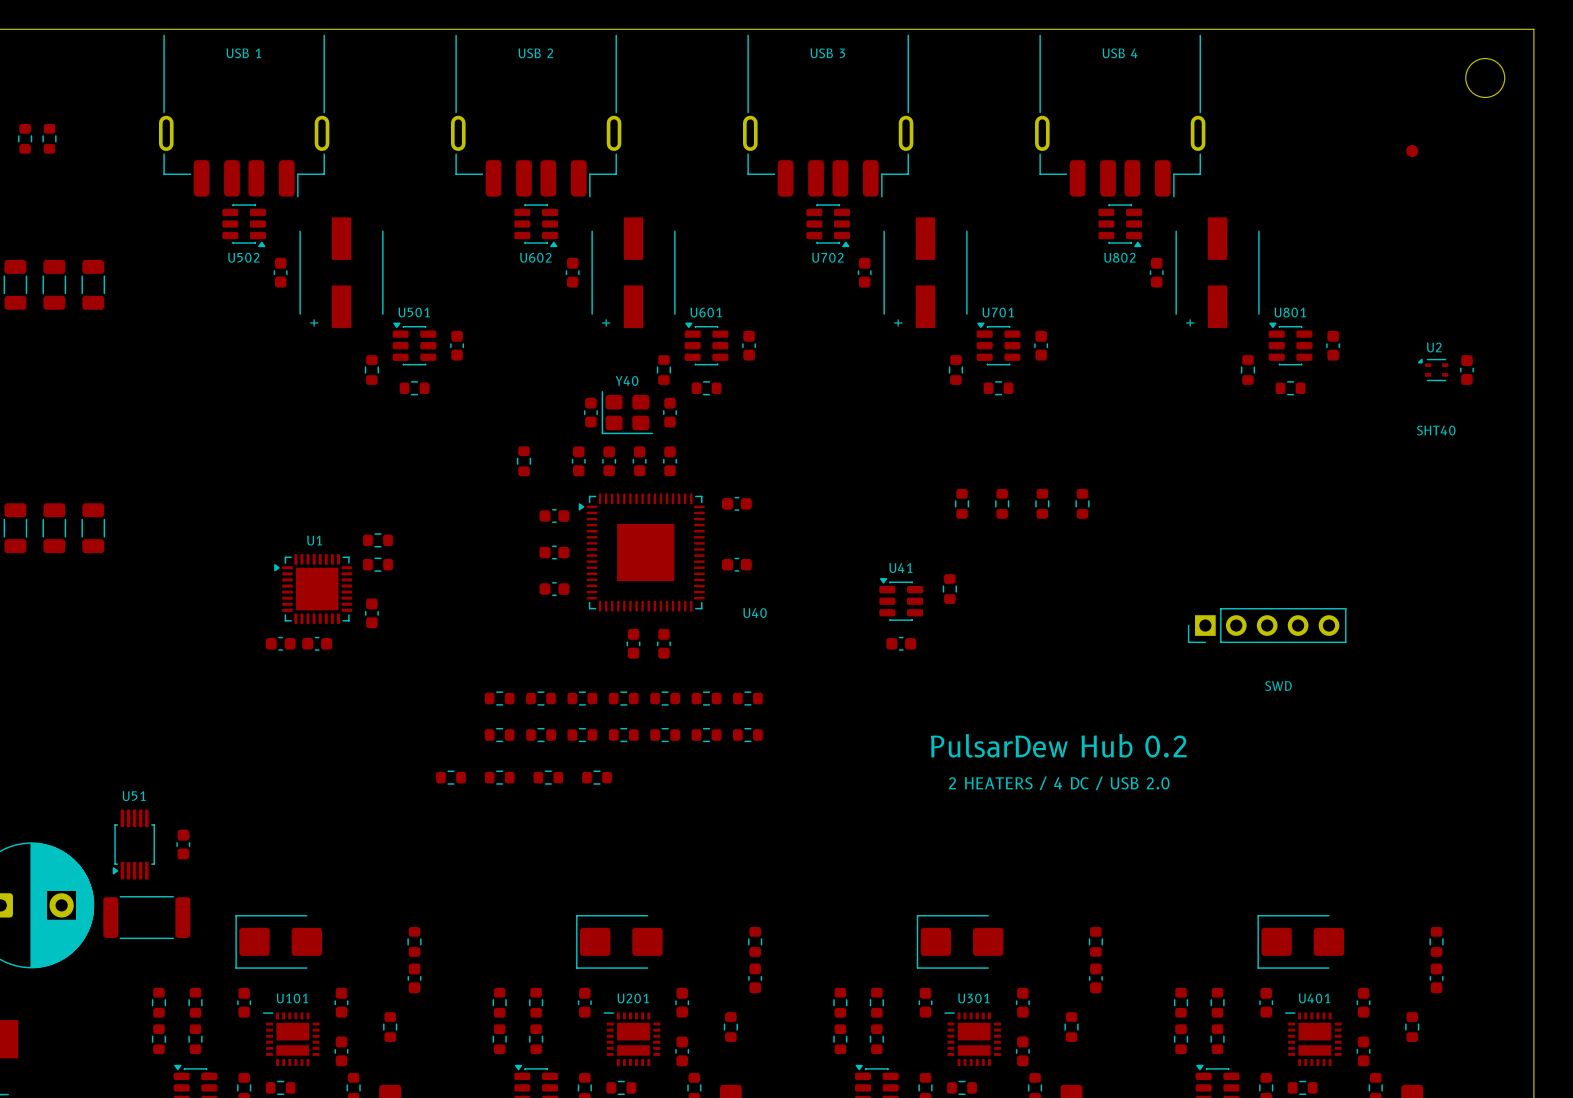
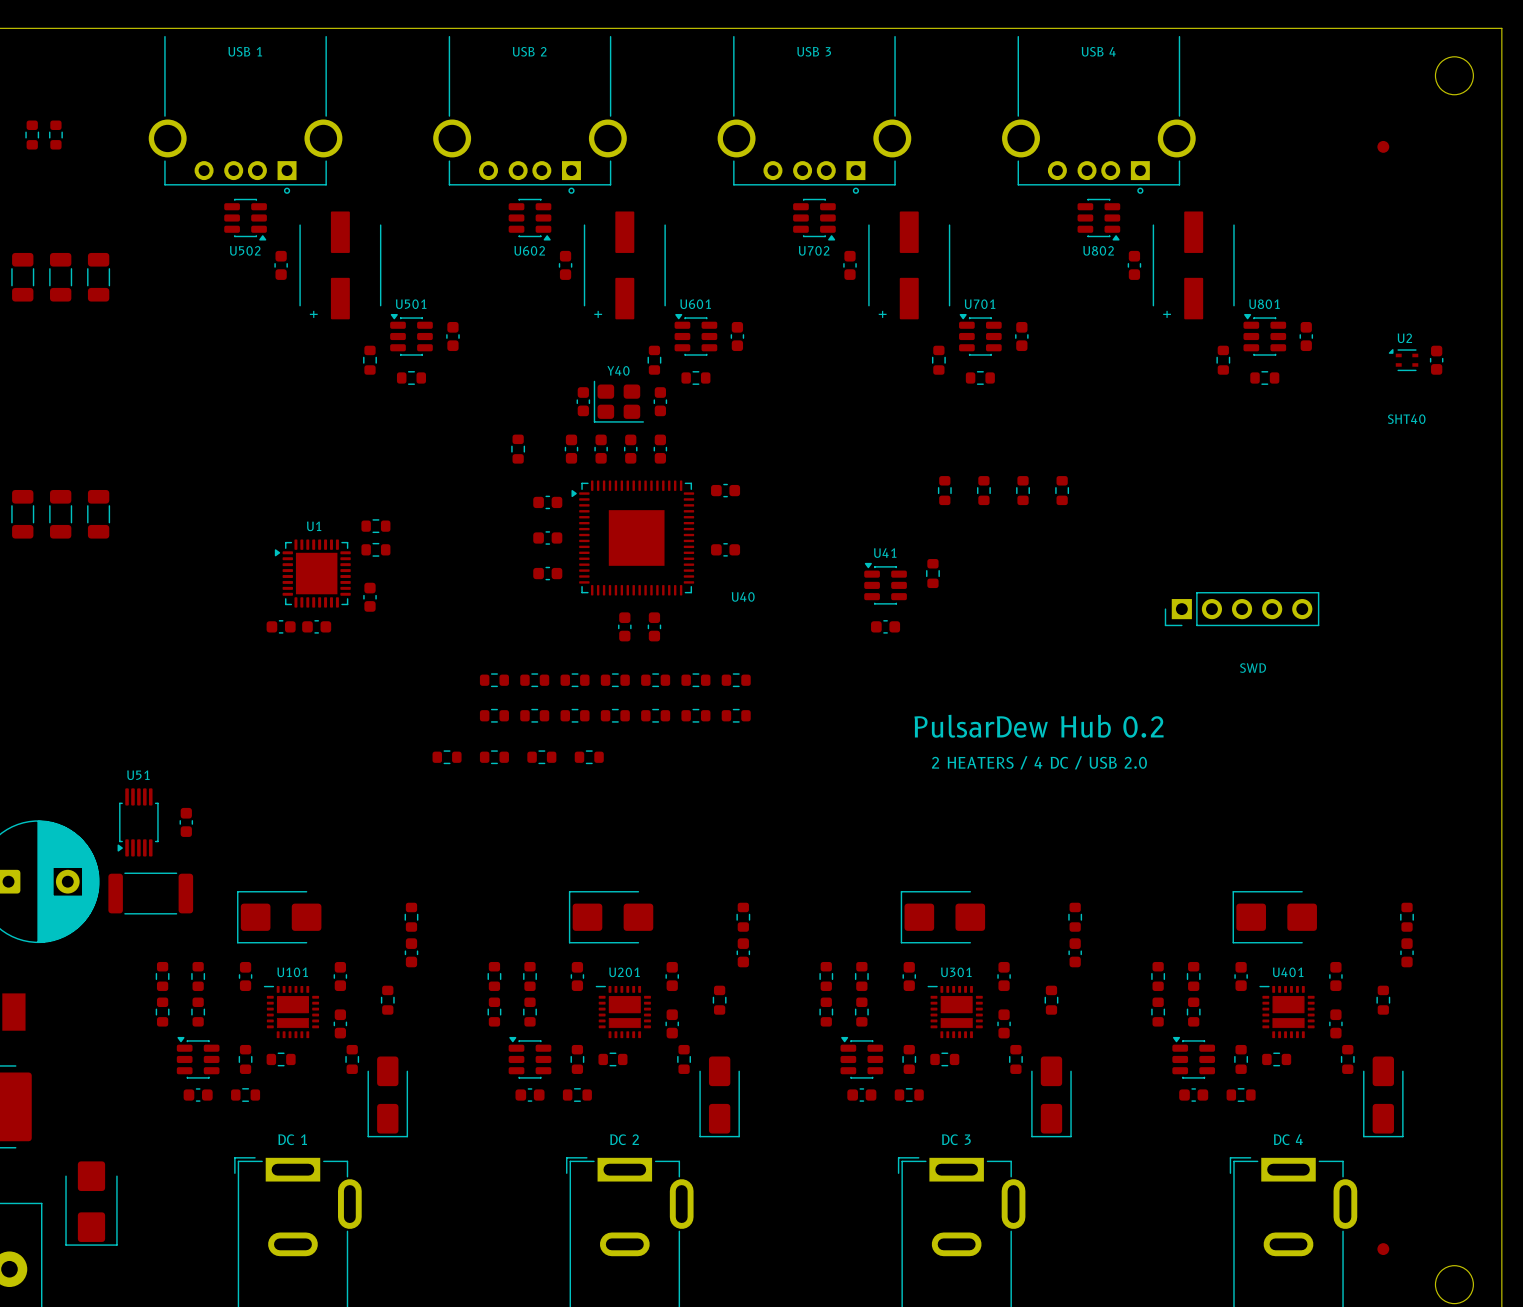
part footprint: [158, 34, 330, 198] -> [148, 35, 343, 194]
part footprint: [450, 34, 622, 198] -> [433, 35, 627, 194]
part footprint: [743, 34, 914, 198] -> [717, 35, 912, 194]
part footprint: [1035, 34, 1206, 198] -> [1002, 35, 1196, 194]

